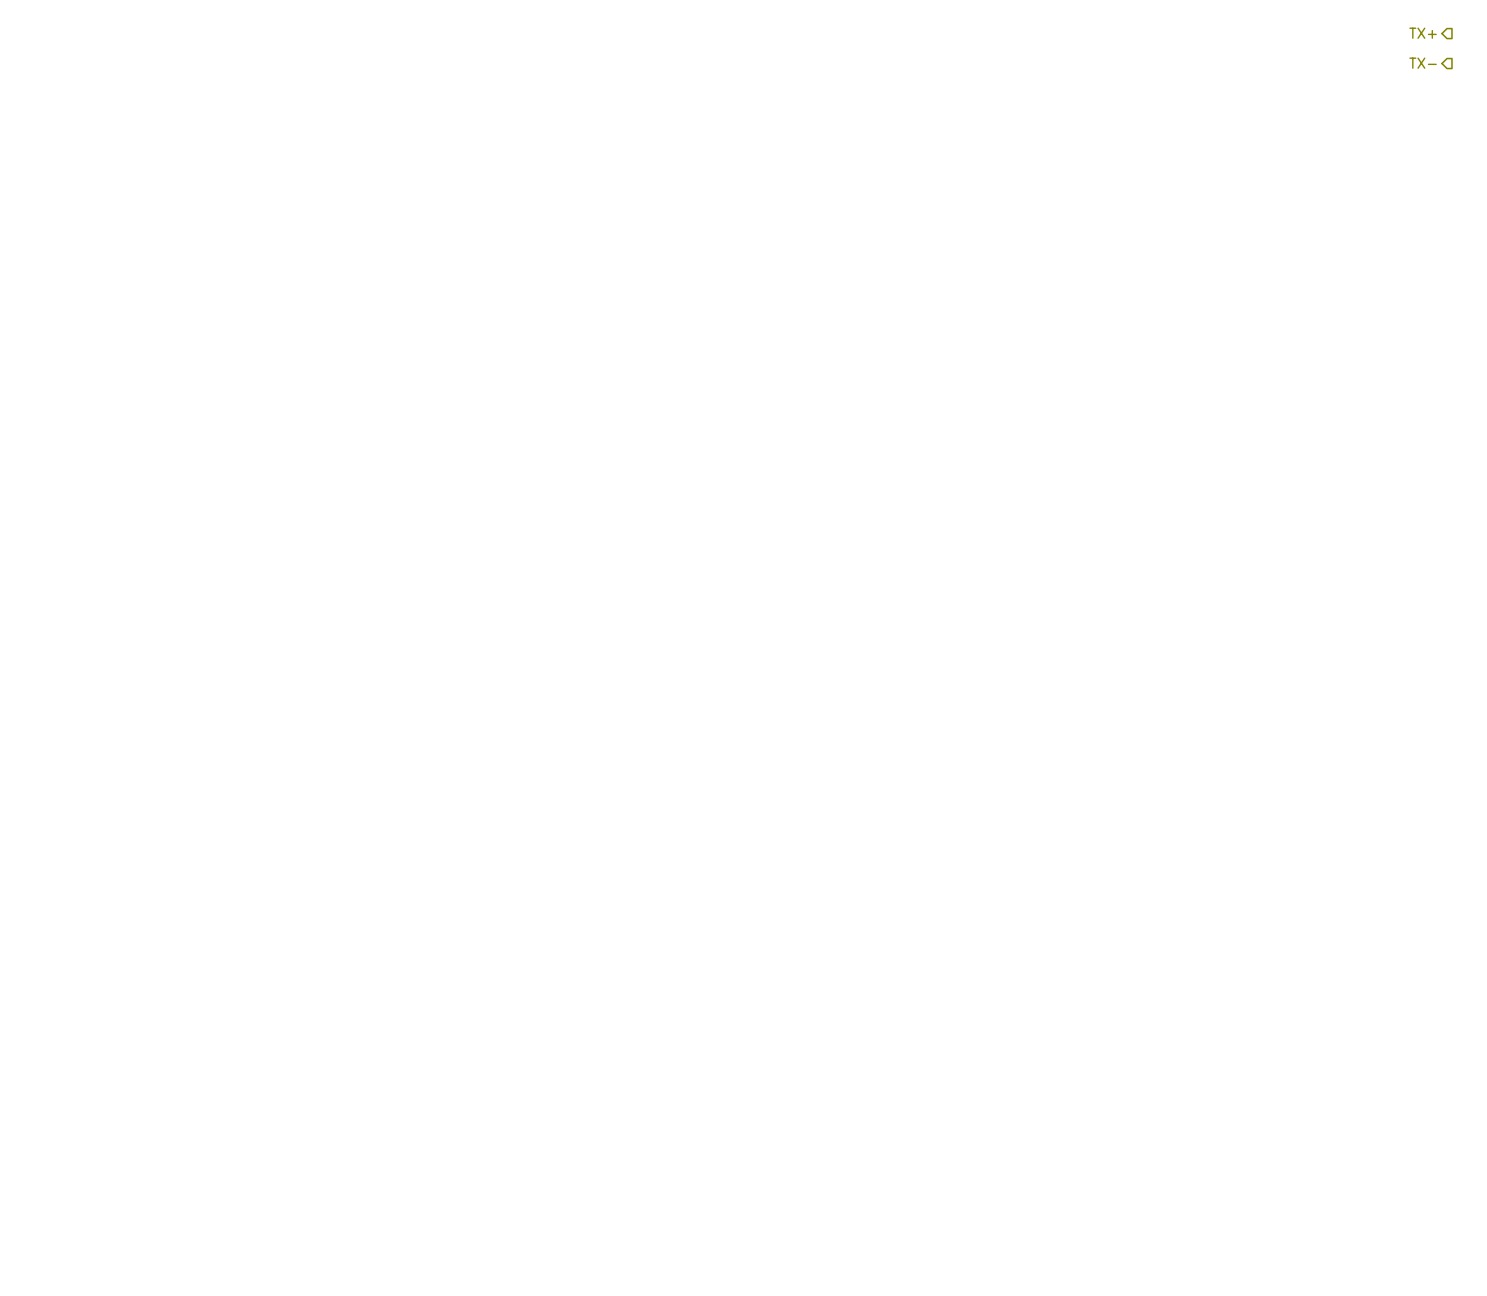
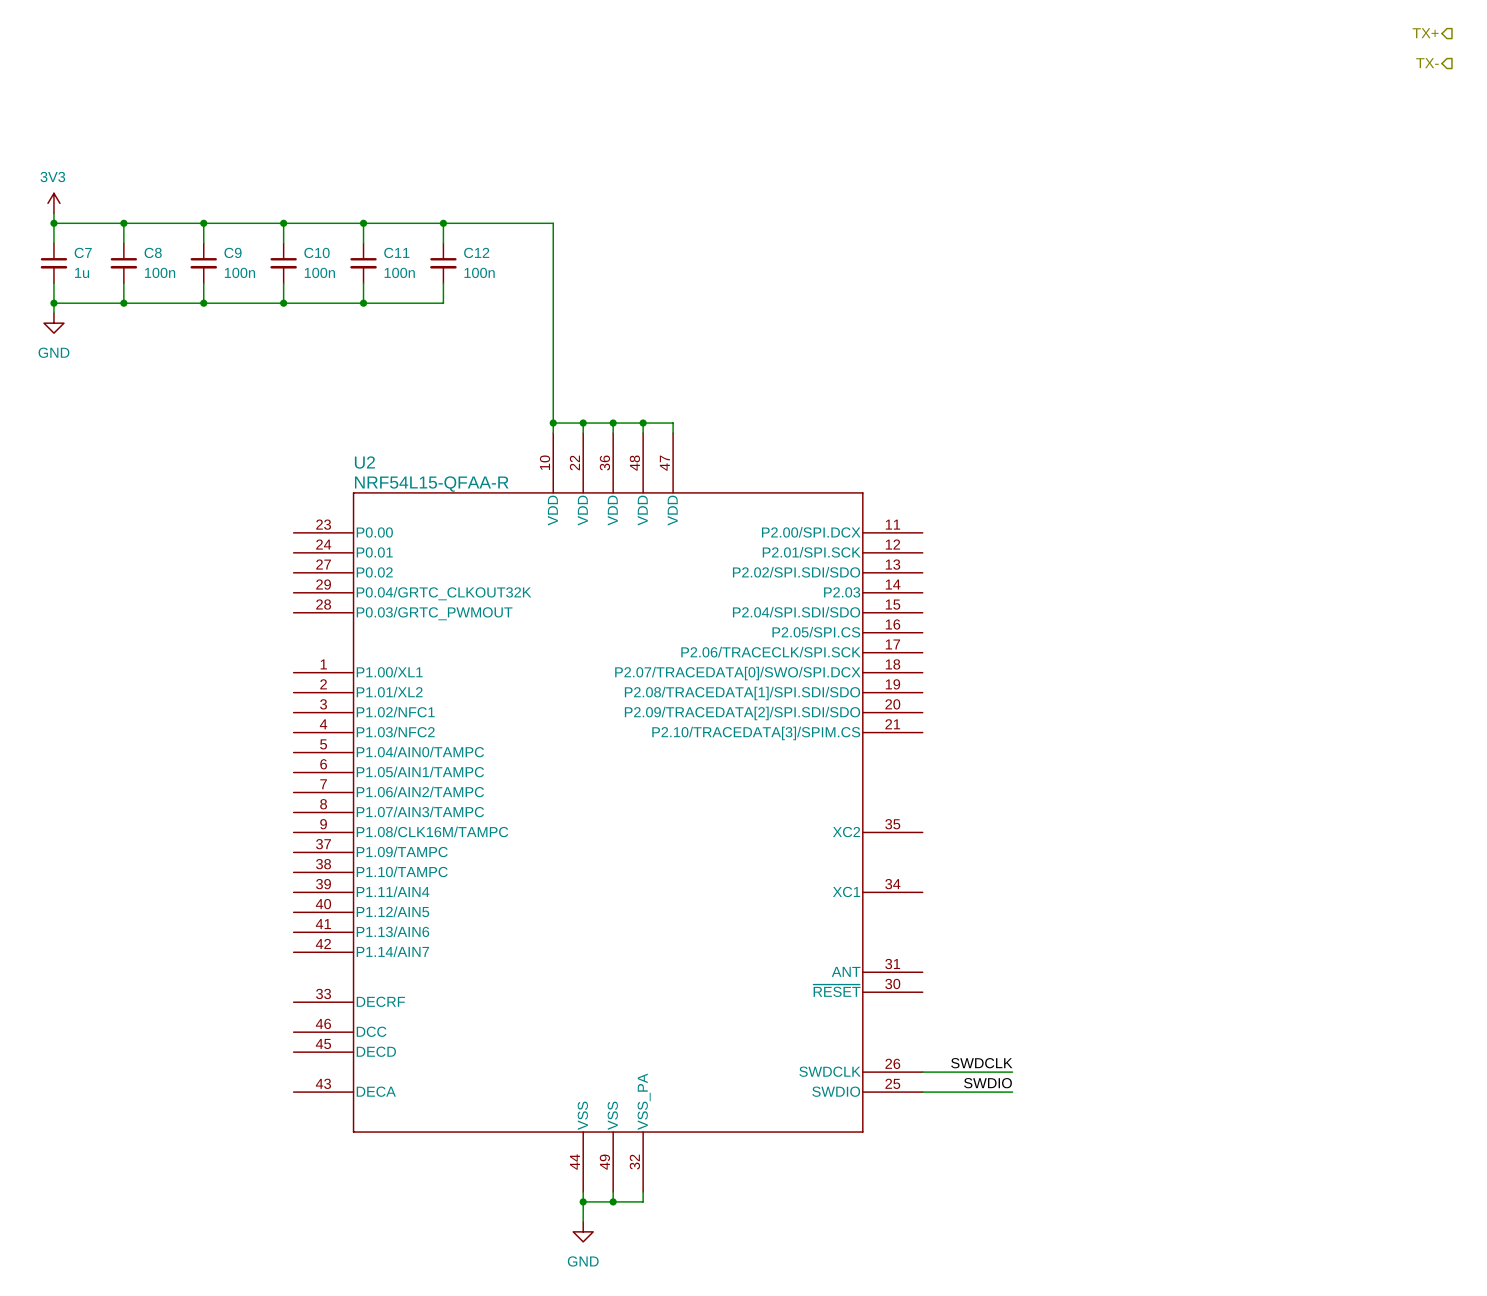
power symbol: none -> 3V3 (53, 203)
wire: none -> (53, 213) (53, 243)
wire: none -> (53, 223) (553, 223) (553, 433)
junction: none -> (53, 223)
wire: none -> (123, 223) (123, 243)
junction: none -> (123, 223)
wire: none -> (203, 223) (203, 243)
junction: none -> (203, 223)
wire: none -> (283, 223) (283, 243)
junction: none -> (283, 223)
wire: none -> (363, 223) (363, 243)
junction: none -> (363, 223)
wire: none -> (443, 223) (443, 243)
junction: none -> (443, 223)
C7: none -> 1u (53, 263)
C8: none -> 100n (123, 263)
C9: none -> 100n (203, 263)
C10: none -> 100n (283, 263)
C11: none -> 100n (363, 263)
C12: none -> 100n (443, 263)
wire: none -> (53, 283) (53, 313)
wire: none -> (123, 283) (123, 303)
wire: none -> (203, 283) (203, 303)
wire: none -> (283, 283) (283, 303)
wire: none -> (363, 283) (363, 303)
wire: none -> (443, 283) (443, 303) (53, 303)
junction: none -> (53, 303)
junction: none -> (123, 303)
junction: none -> (203, 303)
junction: none -> (283, 303)
junction: none -> (363, 303)
power symbol: none -> GND (53, 323)
wire: none -> (553, 423) (673, 423) (673, 433)
junction: none -> (553, 423)
wire: none -> (583, 423) (583, 433)
junction: none -> (583, 423)
wire: none -> (613, 423) (613, 433)
junction: none -> (613, 423)
wire: none -> (643, 423) (643, 433)
junction: none -> (643, 423)
U2: none -> NRF54L15-QFAA-R (608, 812)
label: none -> SWDCLK (981, 1063)
wire: none -> (922, 1072) (1012, 1072)
label: none -> SWDIO (987, 1083)
wire: none -> (922, 1092) (1012, 1092)
wire: none -> (583, 1191) (583, 1221)
wire: none -> (613, 1191) (613, 1201)
wire: none -> (643, 1191) (643, 1201) (583, 1201)
junction: none -> (583, 1201)
junction: none -> (613, 1201)
power symbol: none -> GND (583, 1231)

